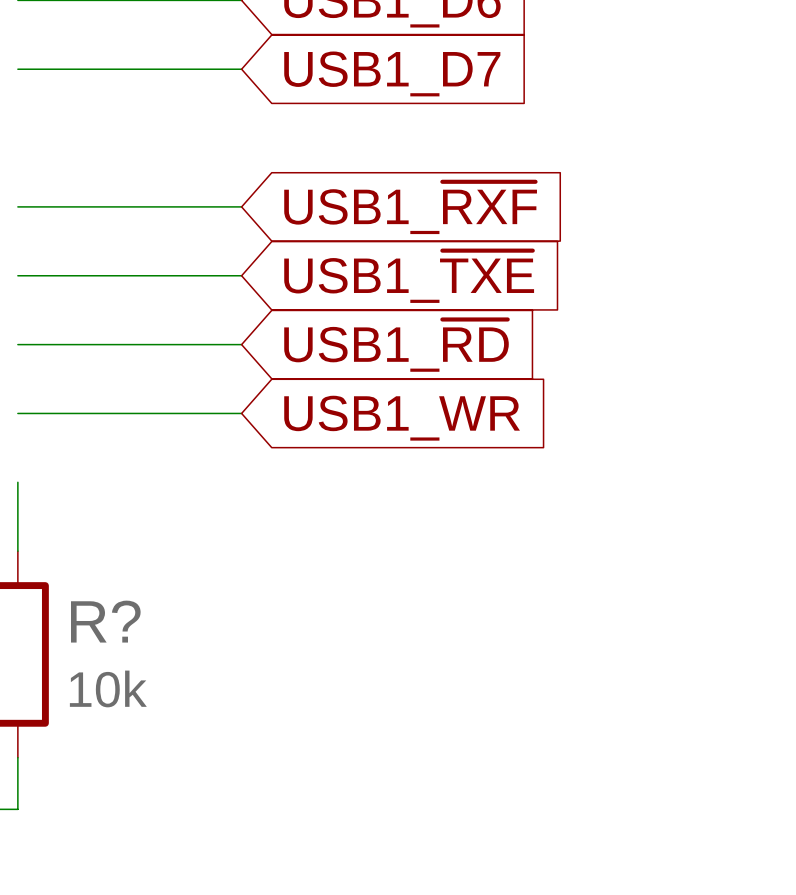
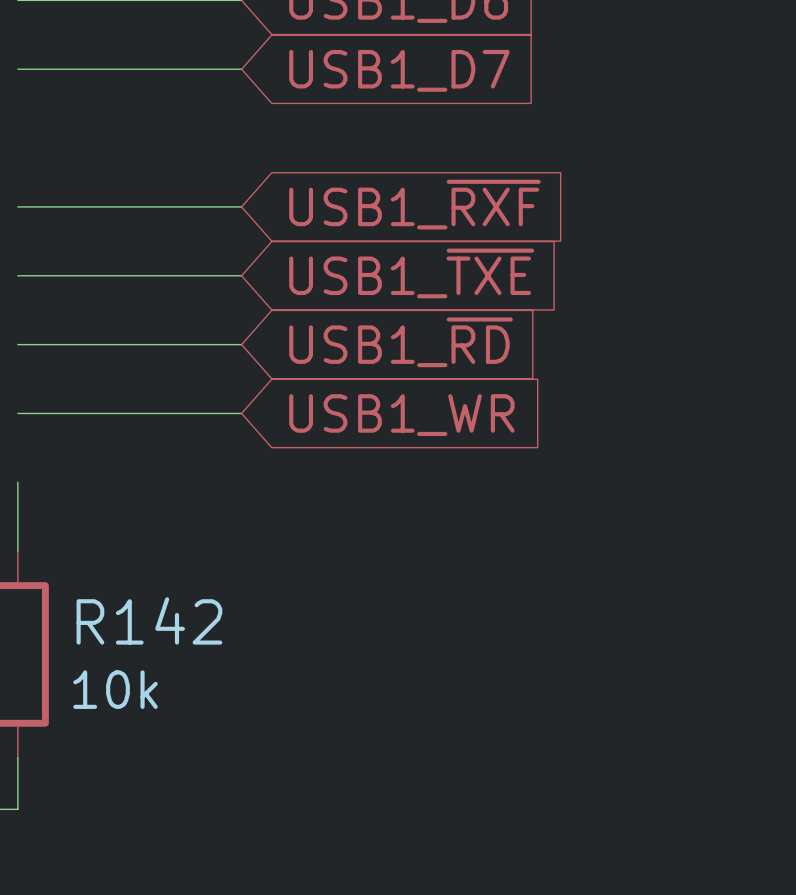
R? name: R? (105, 621) -> R142 (149, 620)

